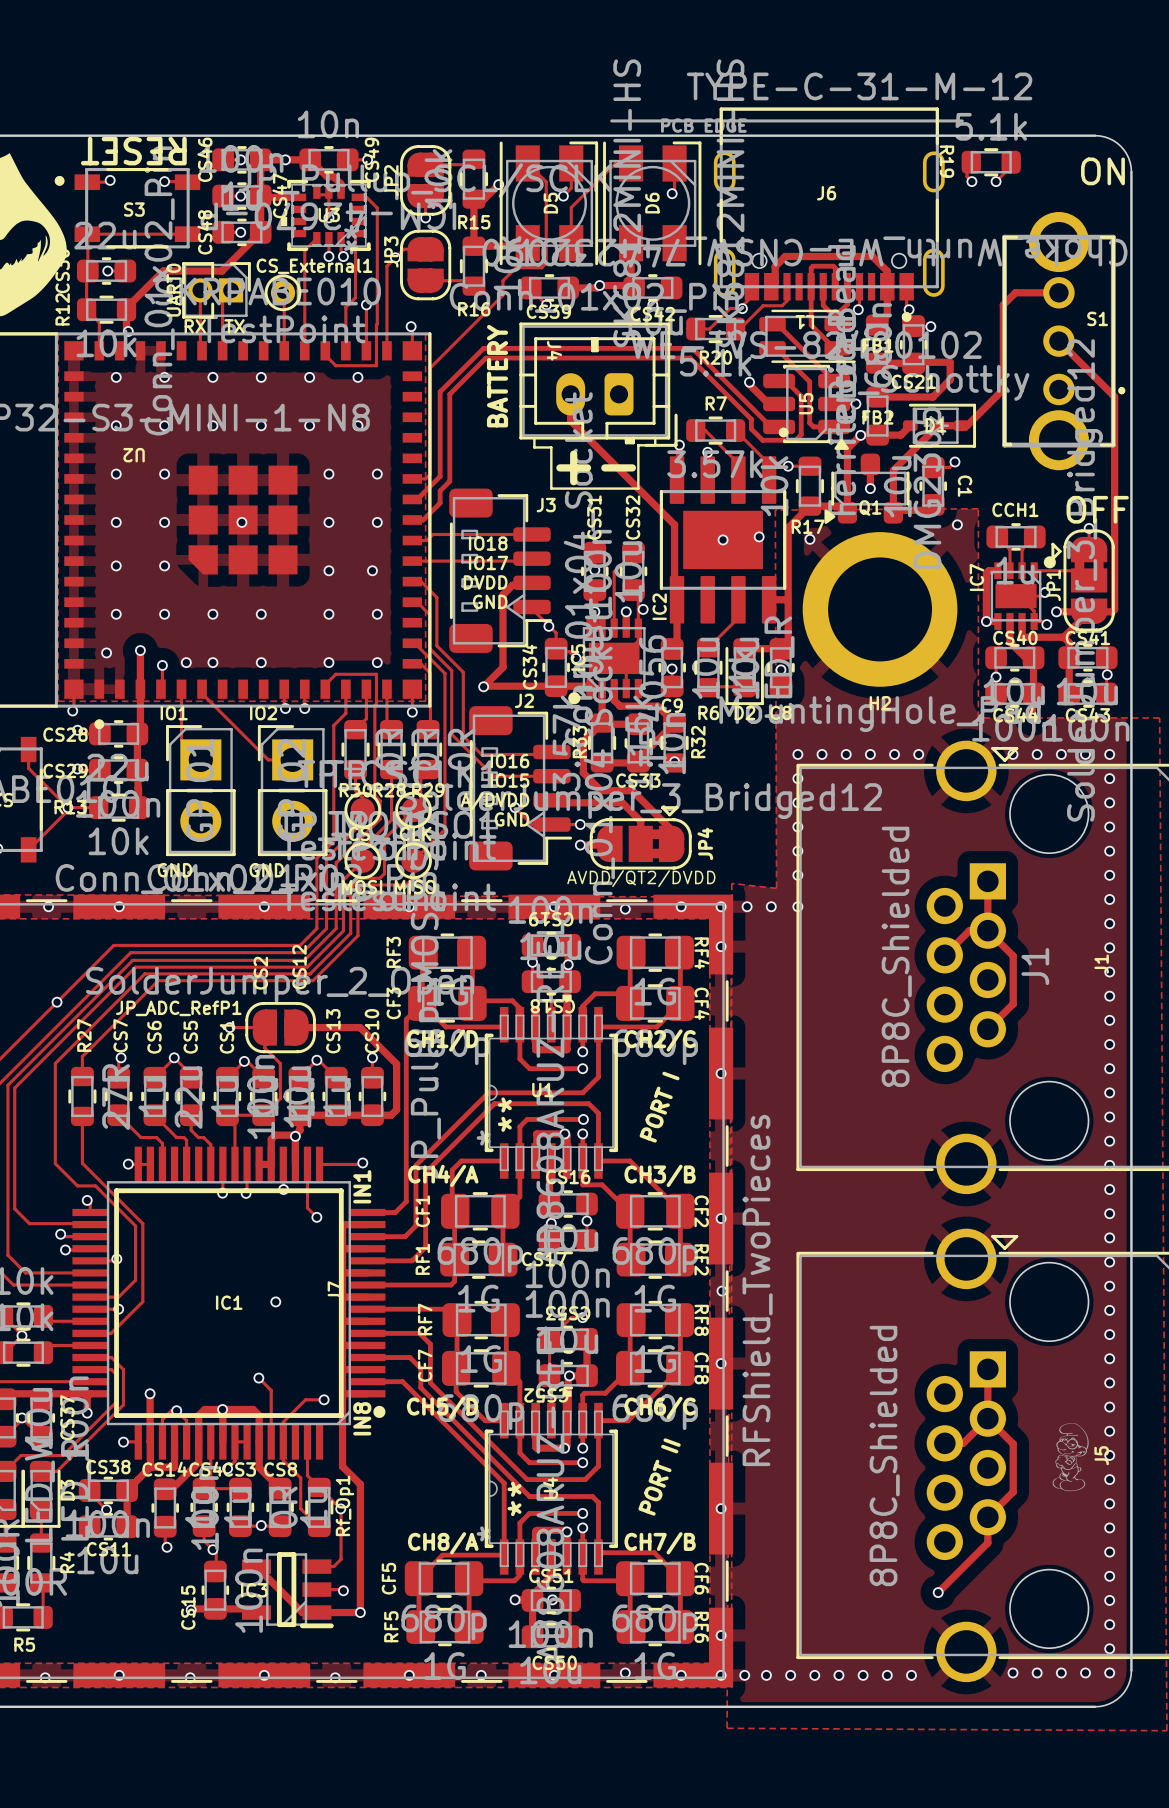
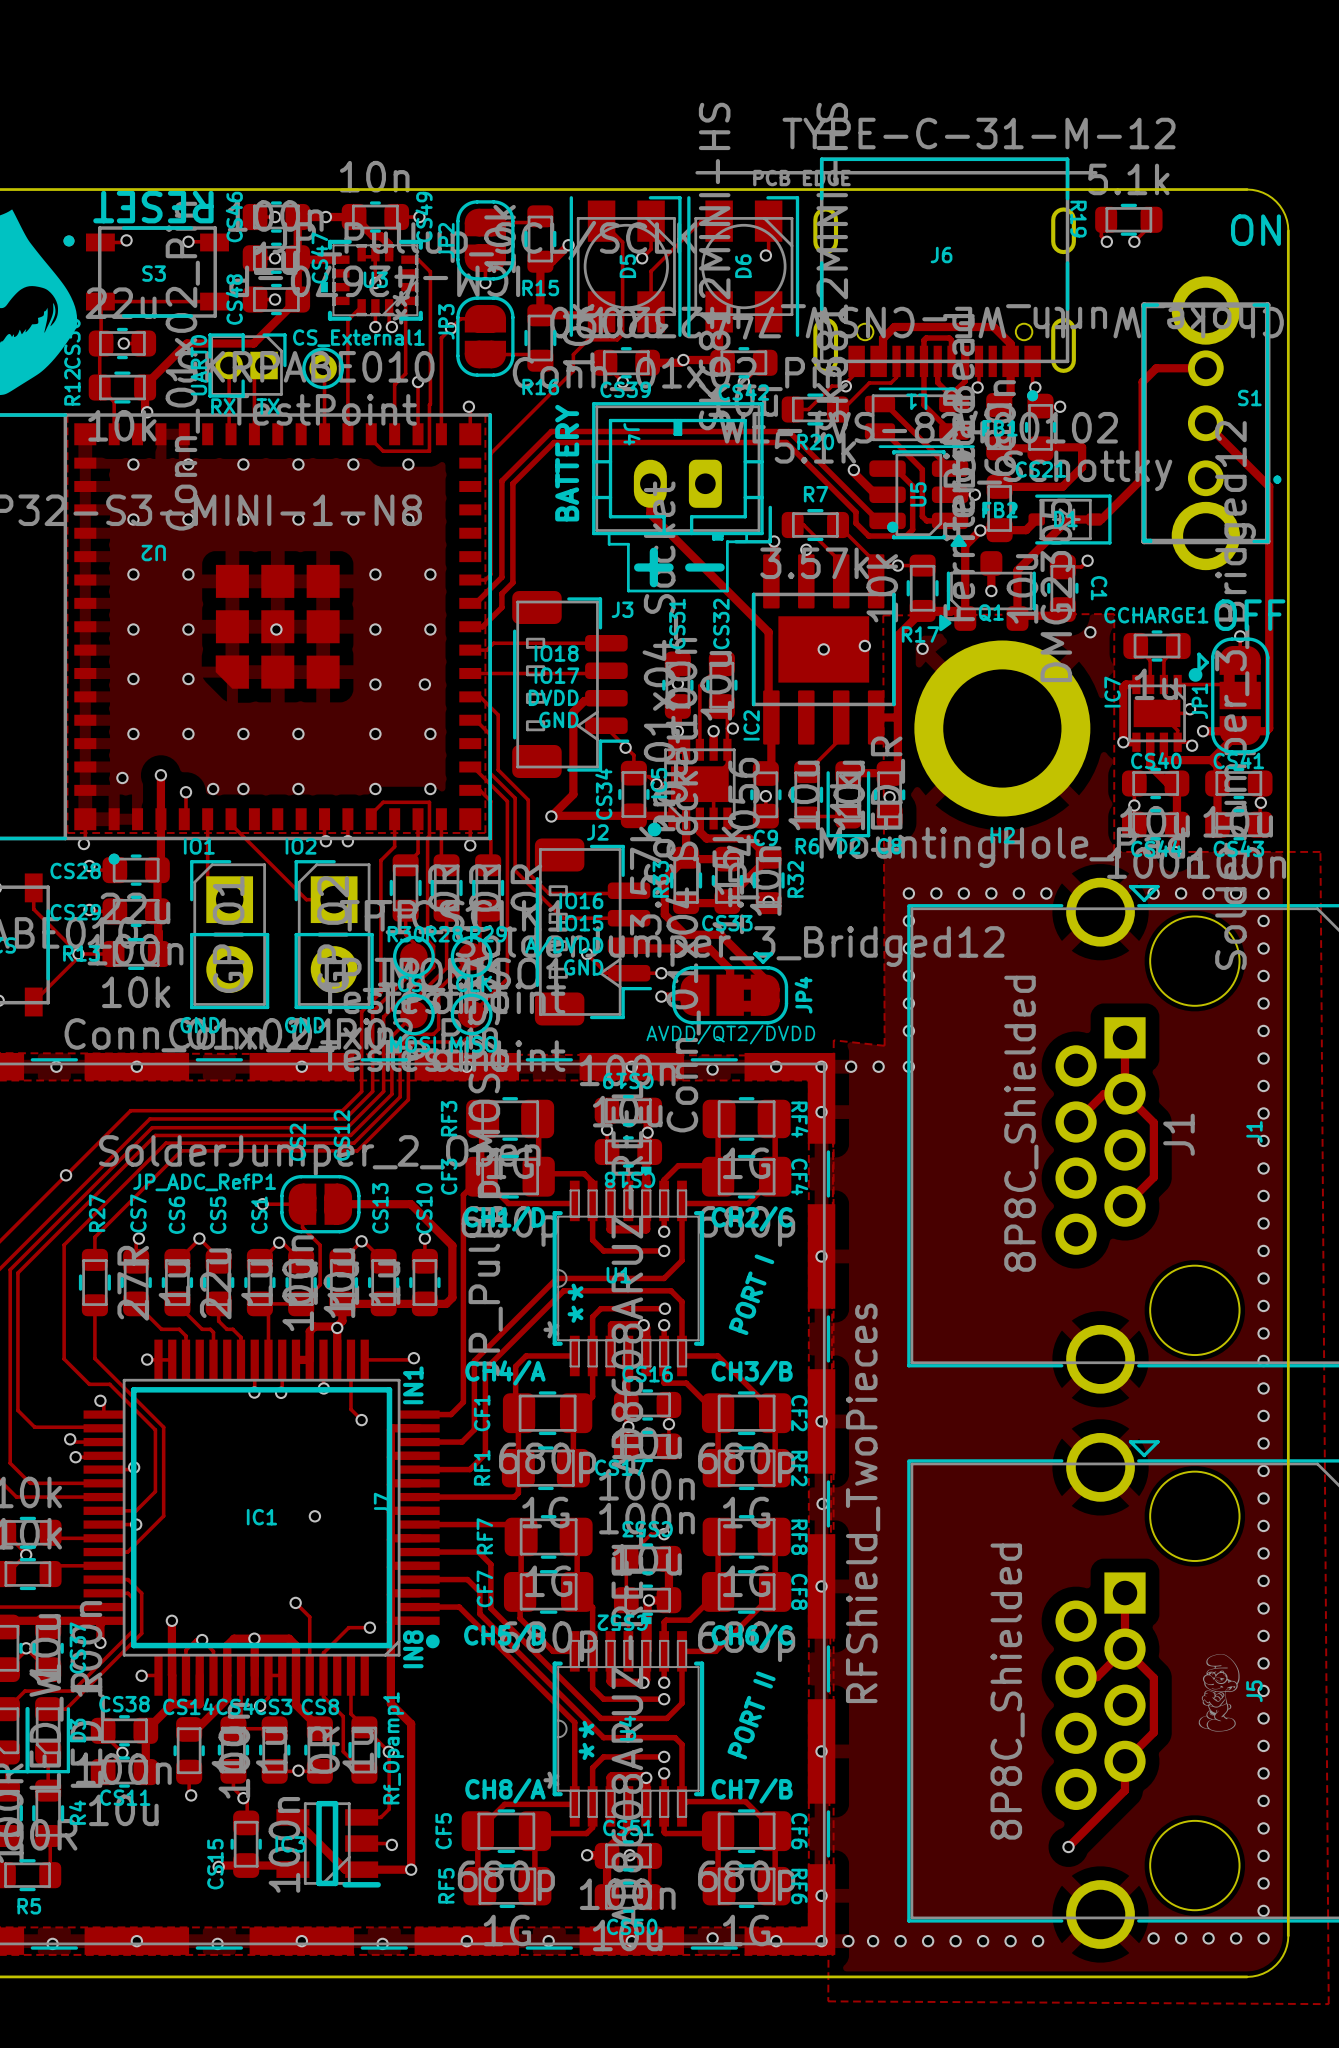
CCH1 name: CCH1 (1015, 509) -> CCHARGE1 (1156, 615)
Rf_Op1 name: Rf_Op1 (345, 1505) -> Rf_Opamp1 (393, 1748)

